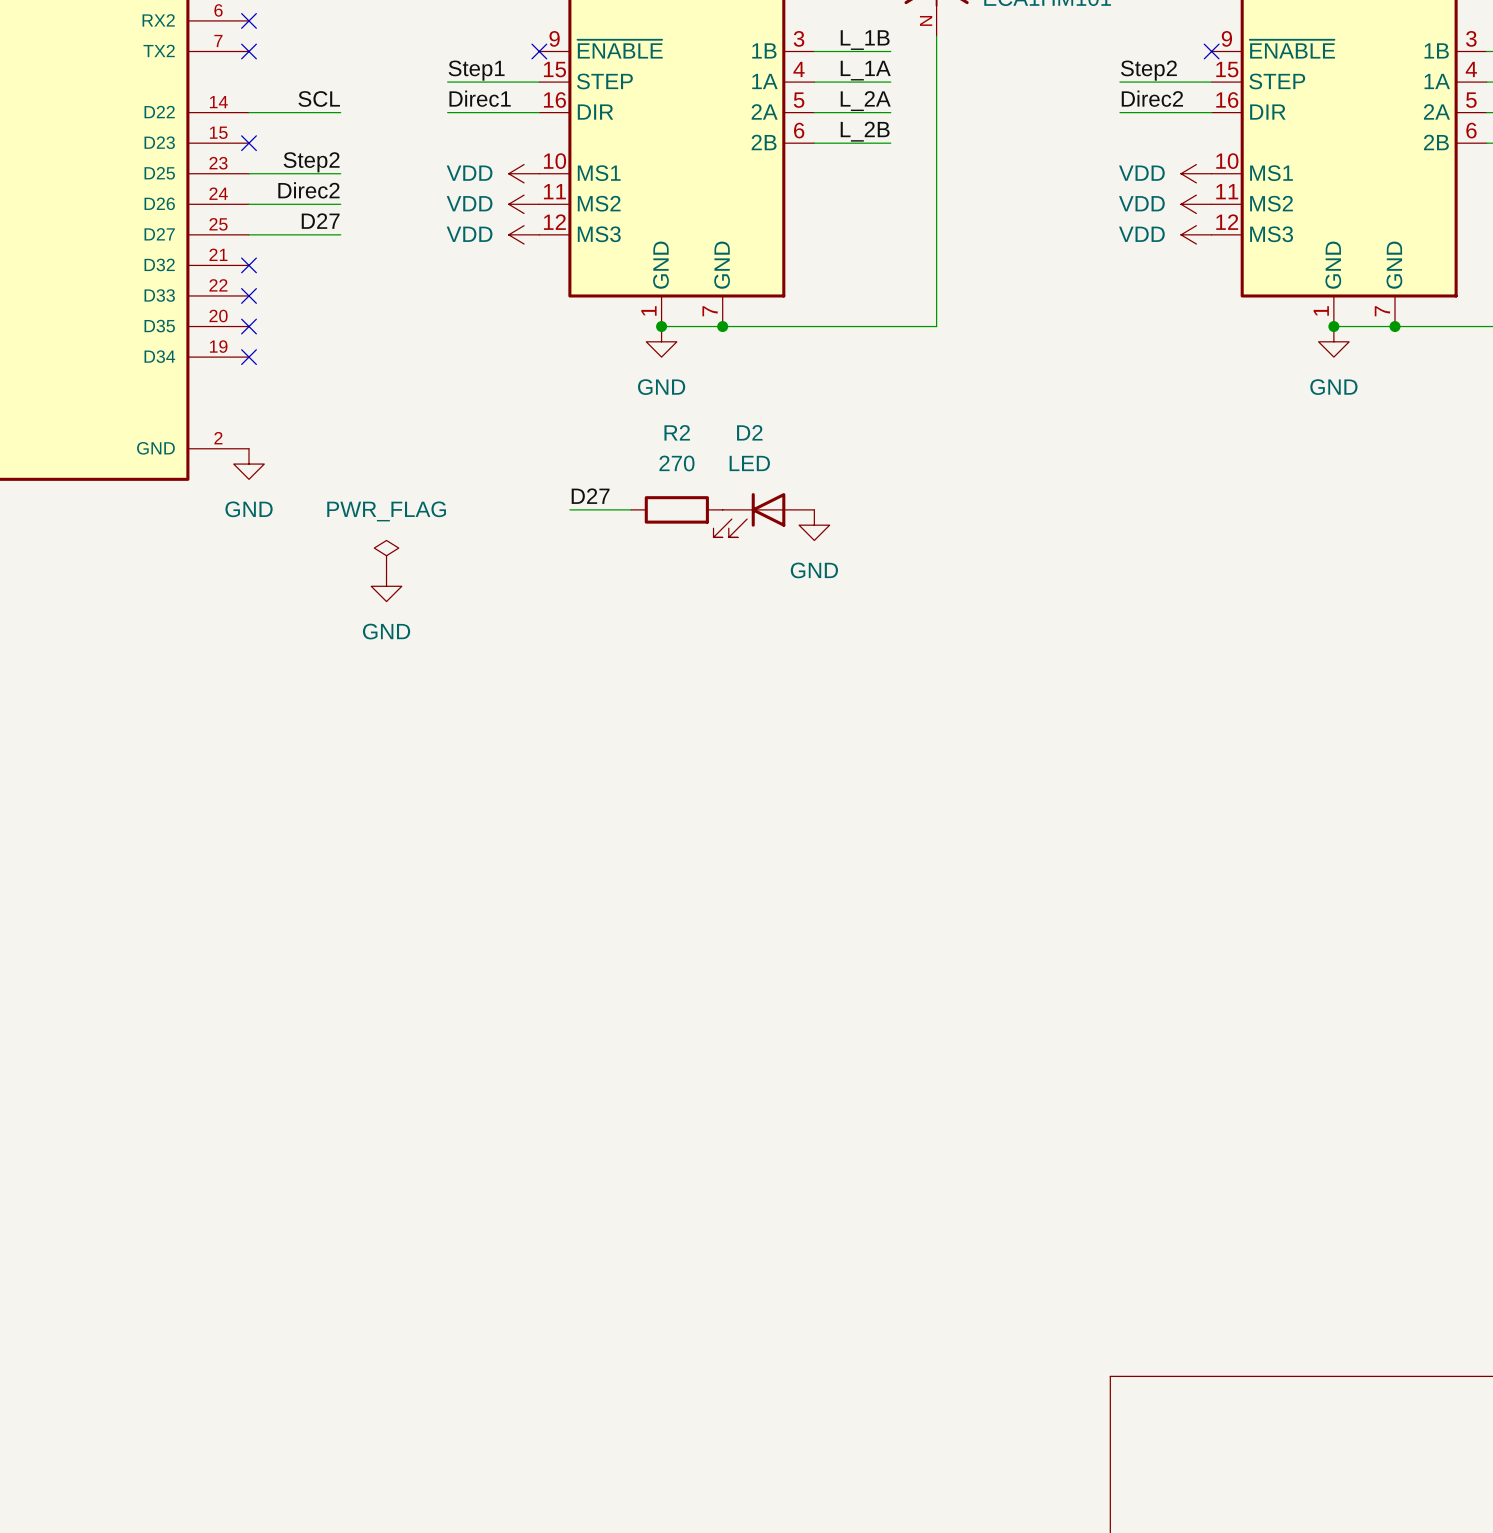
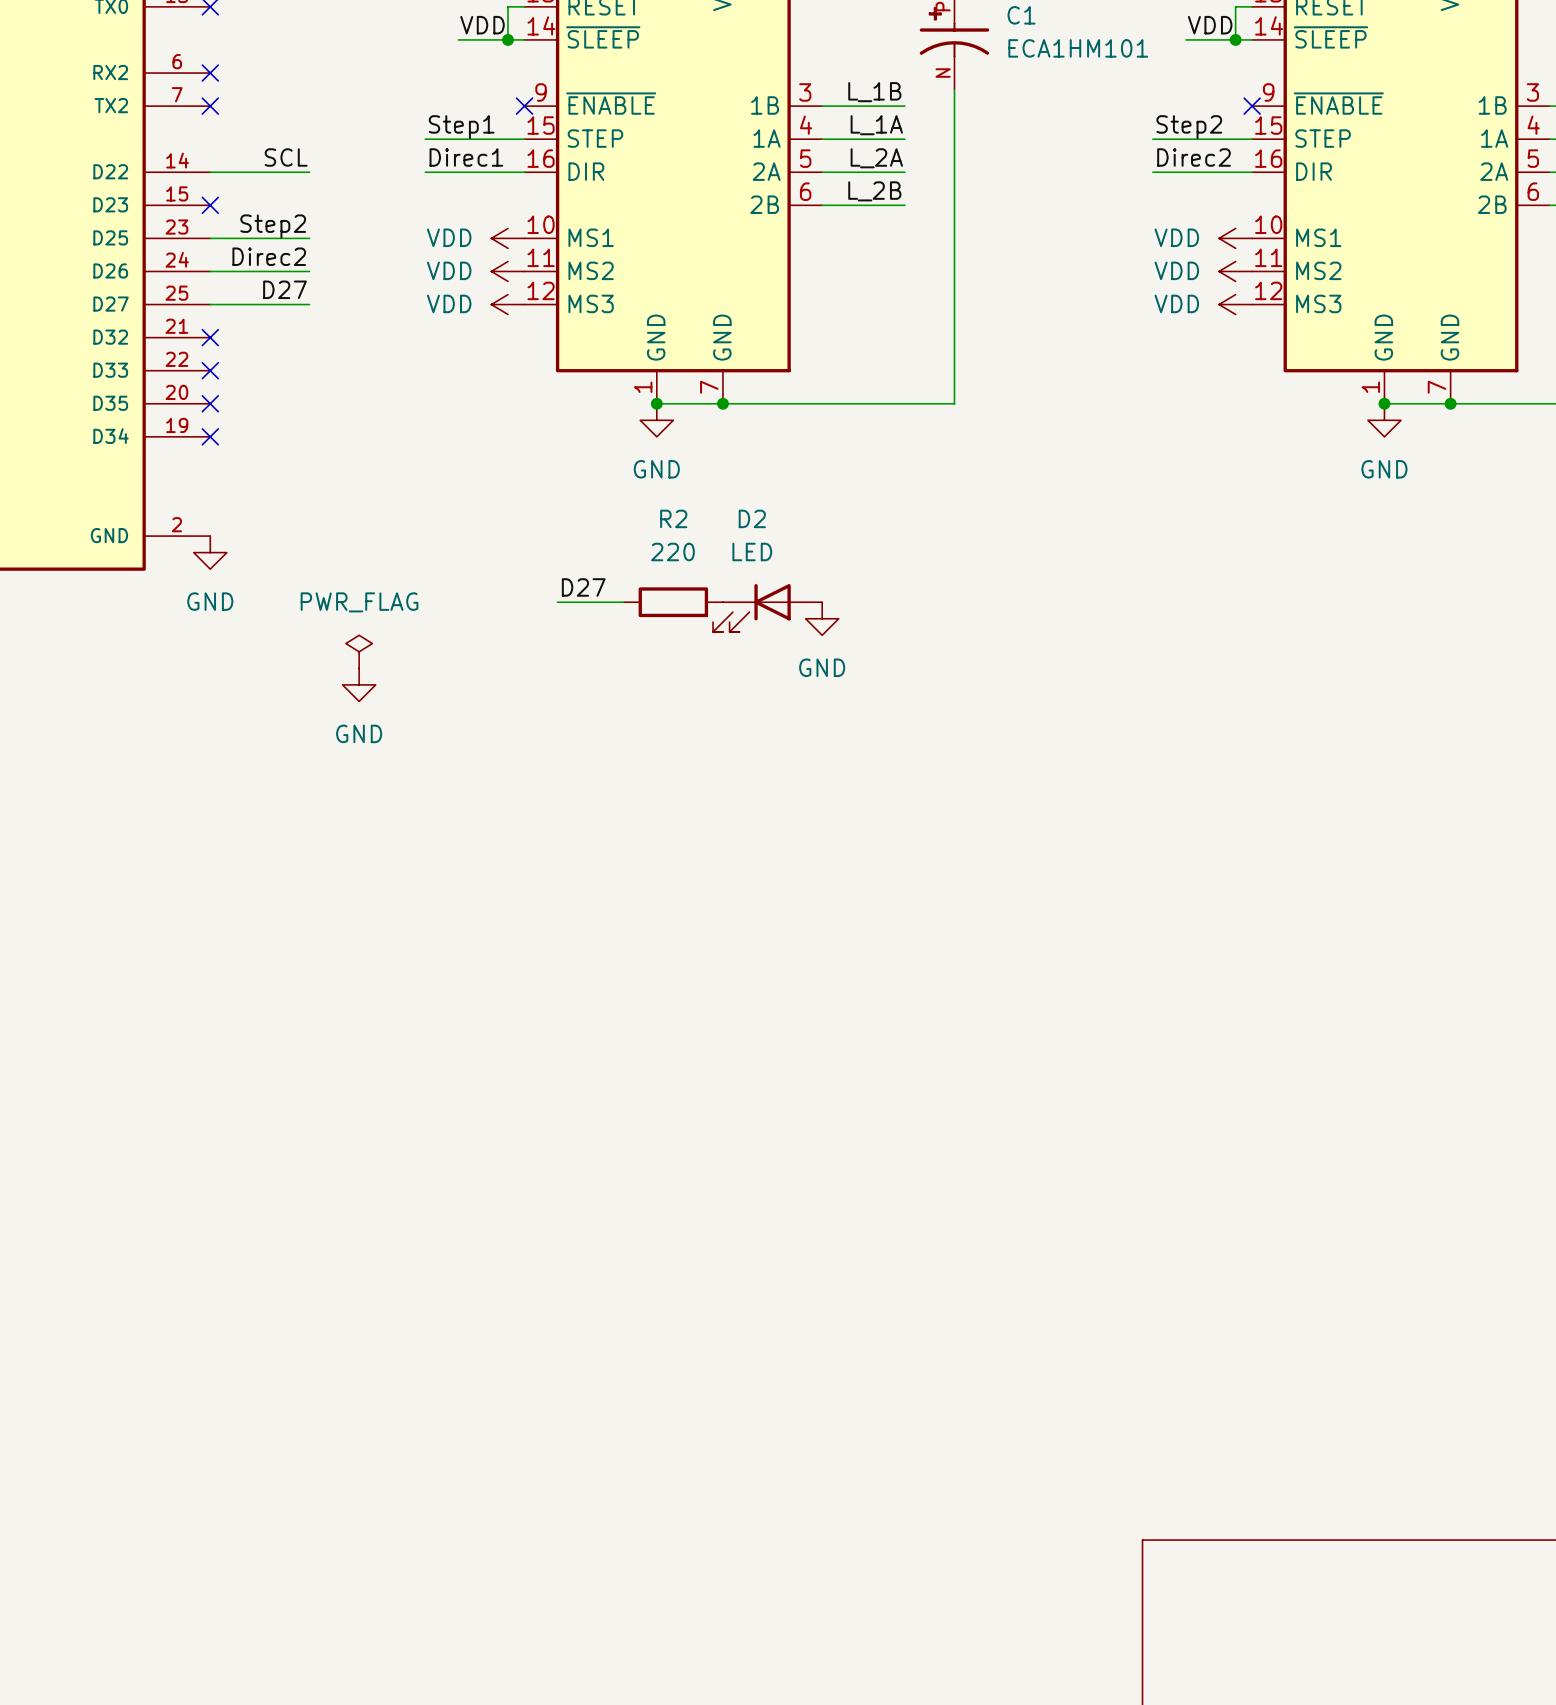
R2 value: 270 (676, 463) -> 220 (672, 551)

